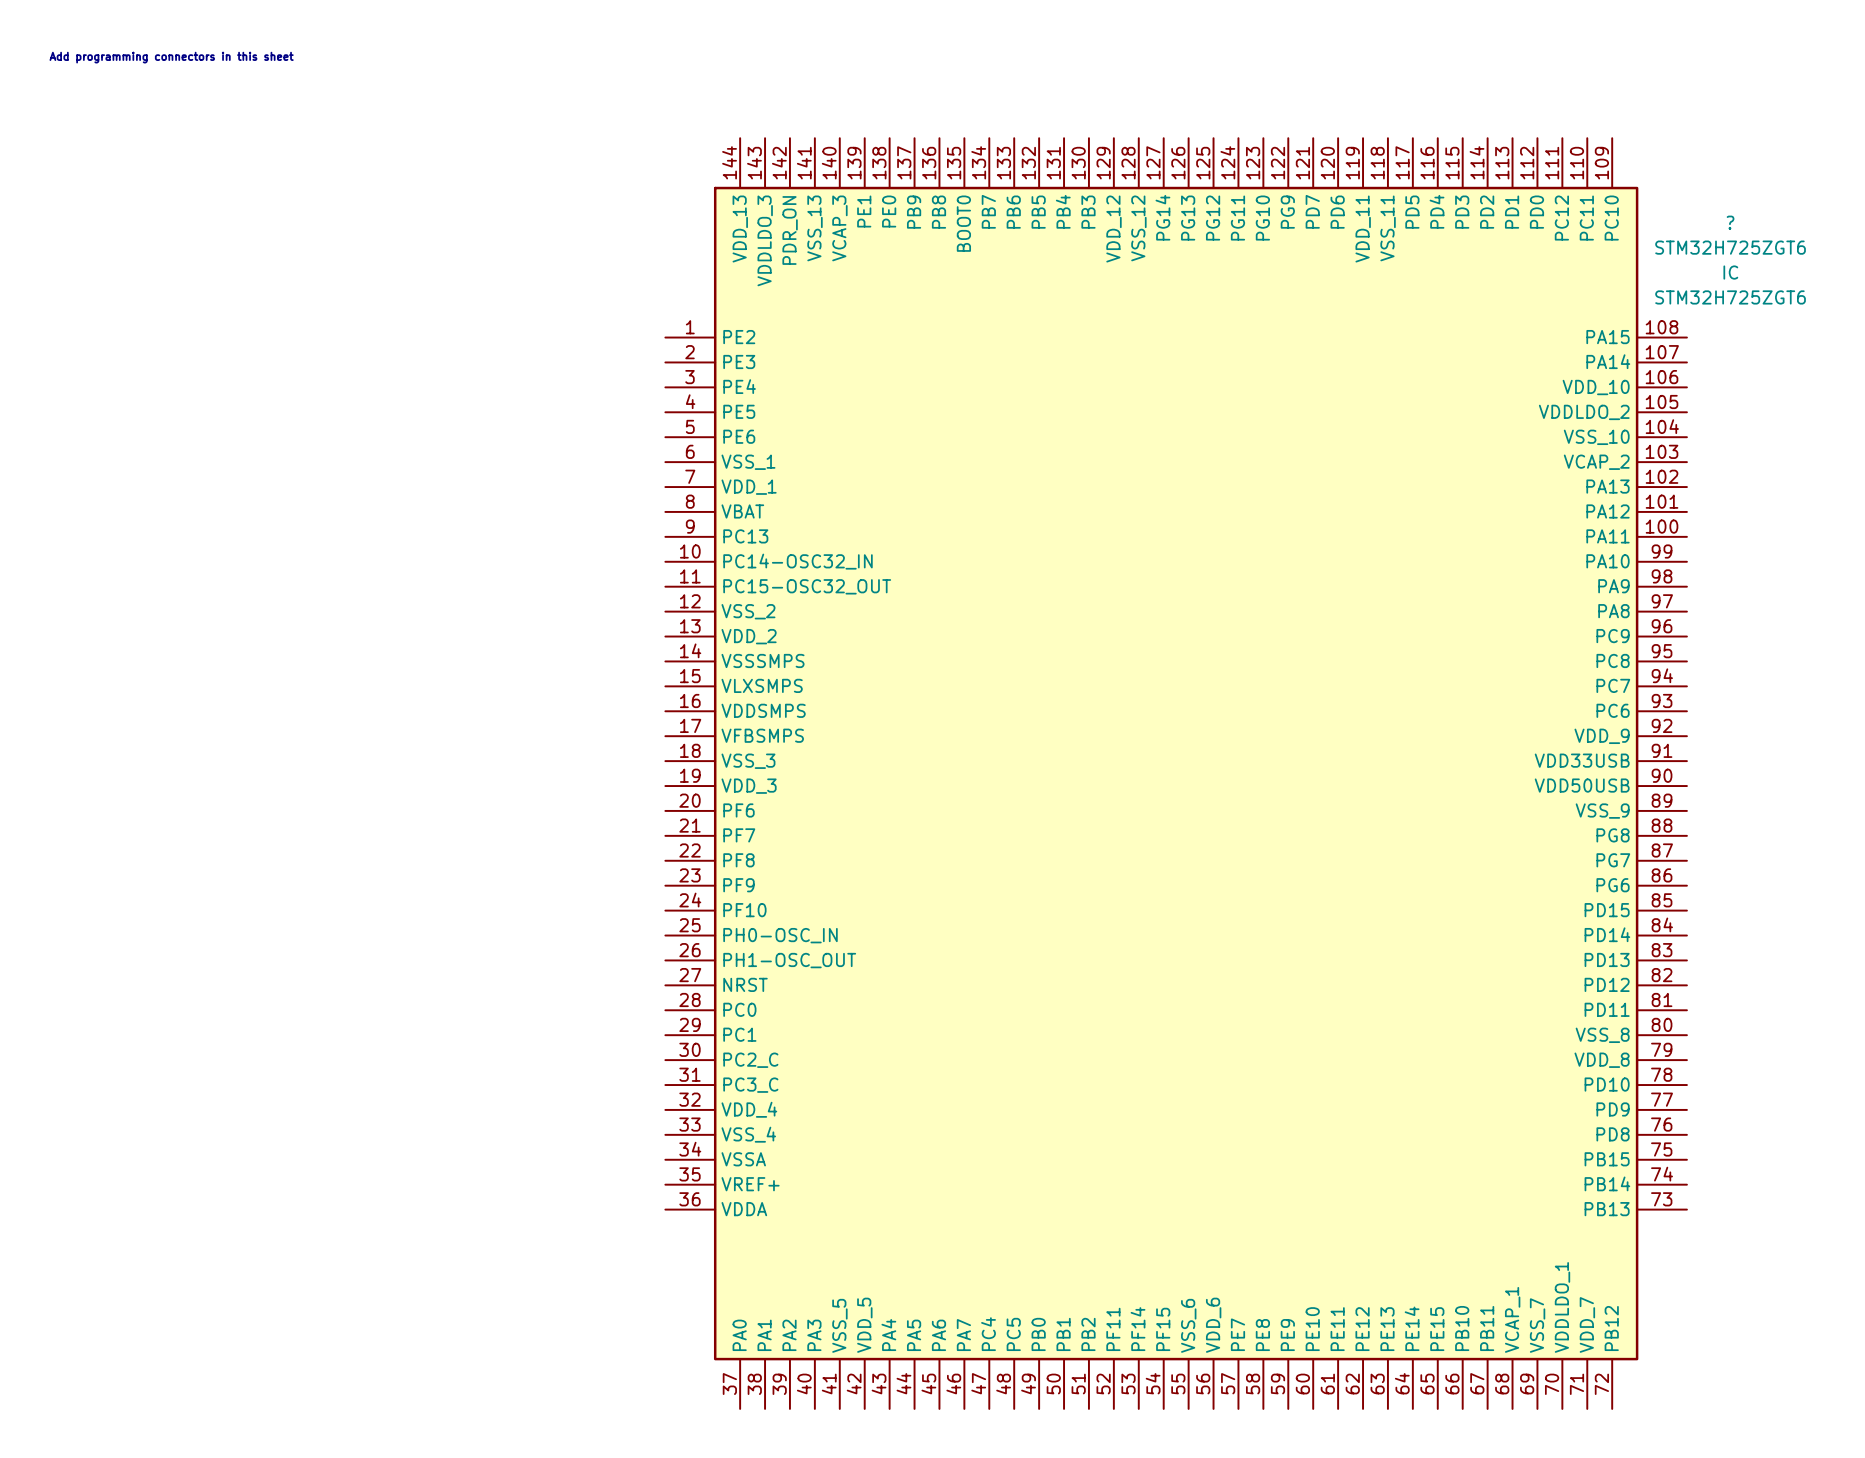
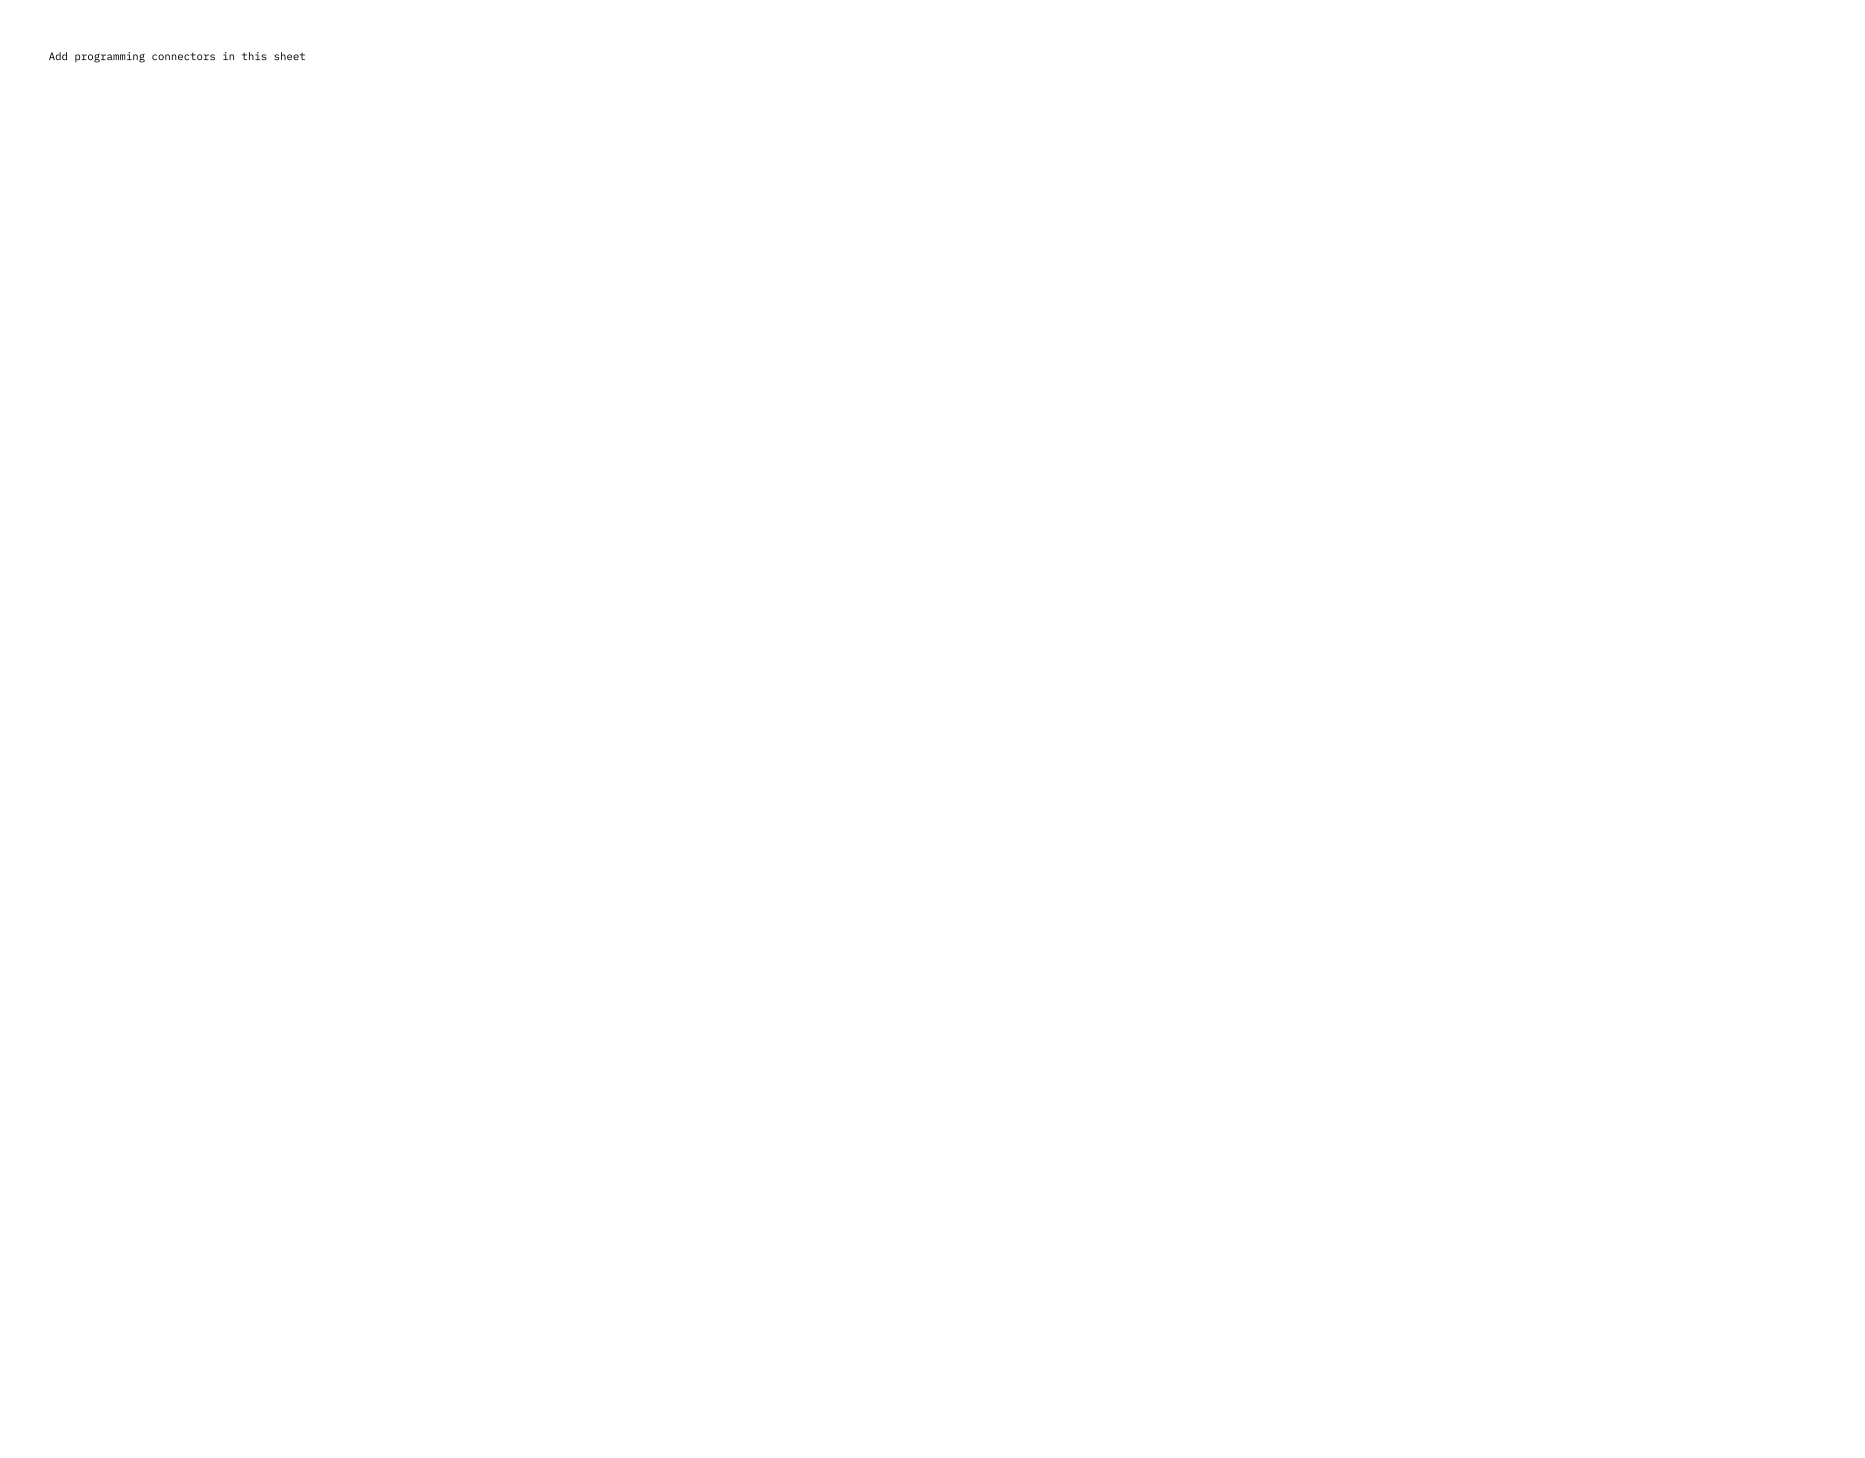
part: STM32H725ZGT6 (1176, 773) -> none

